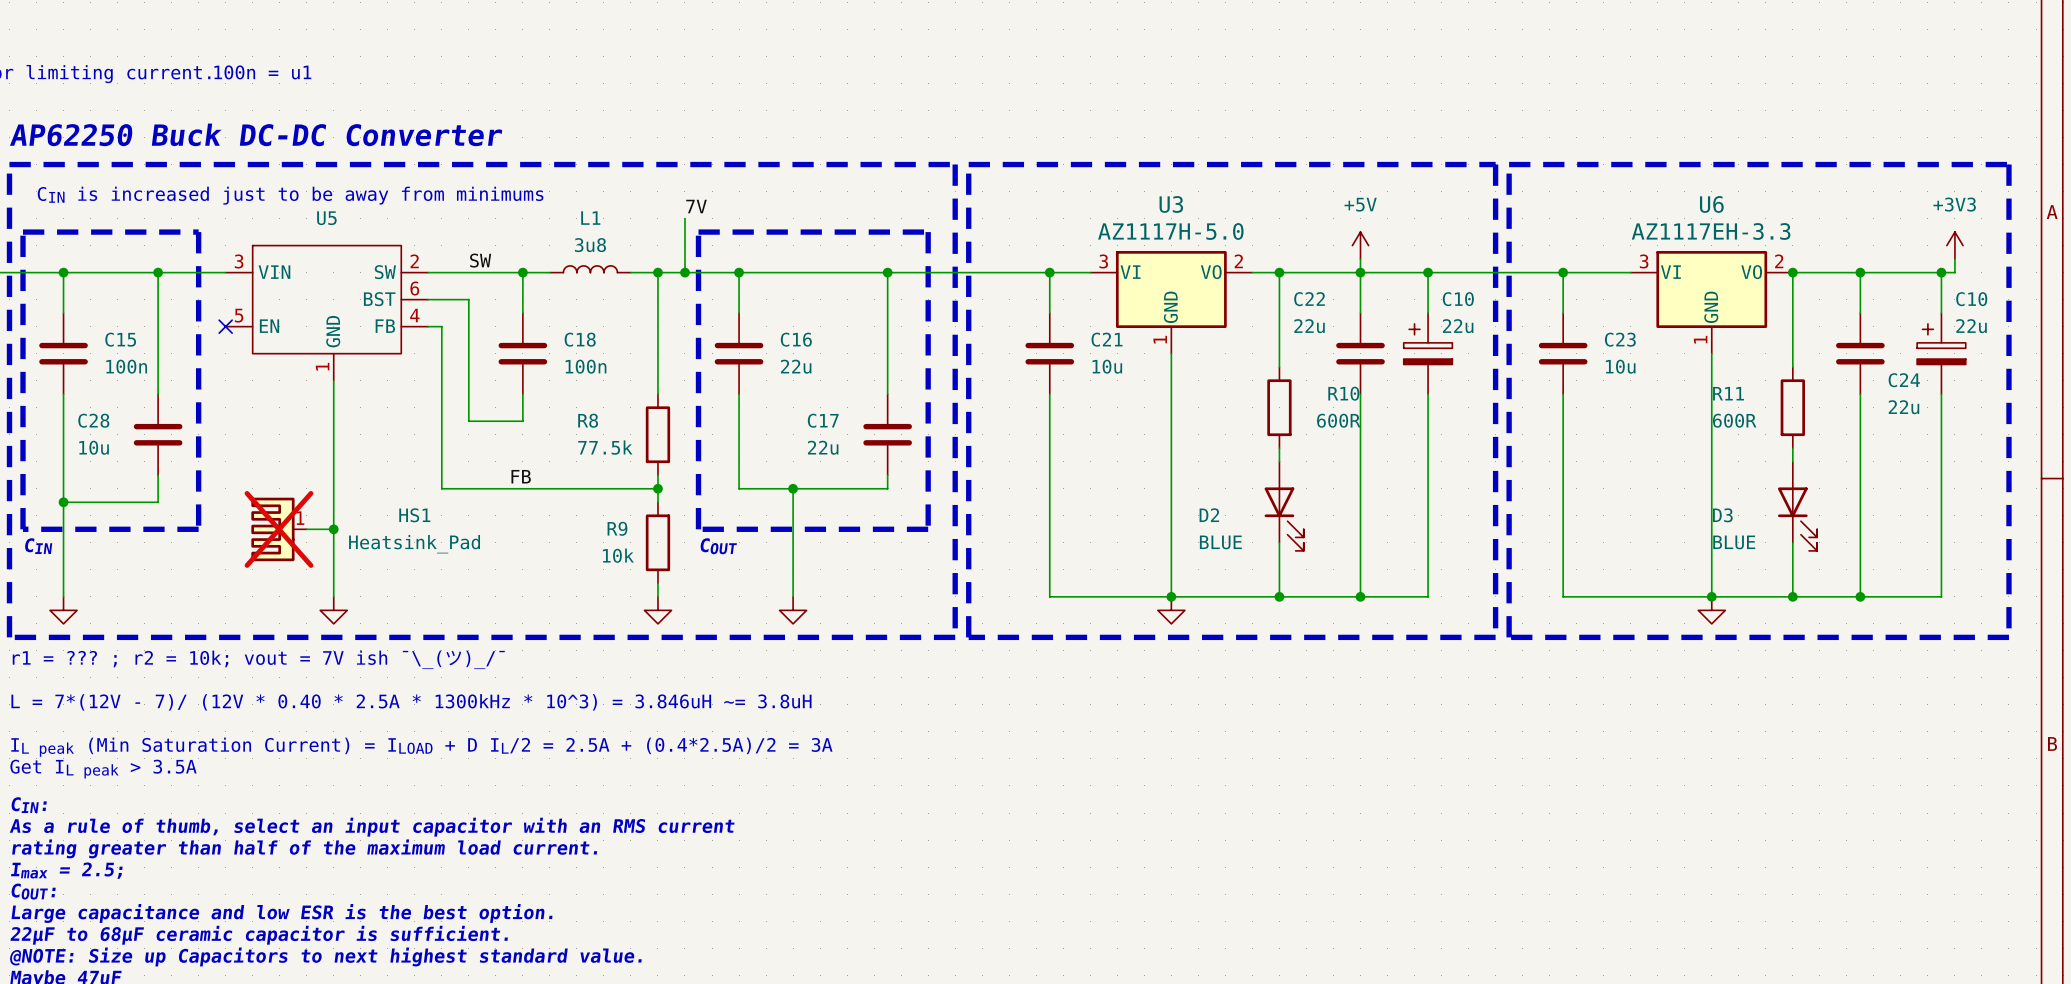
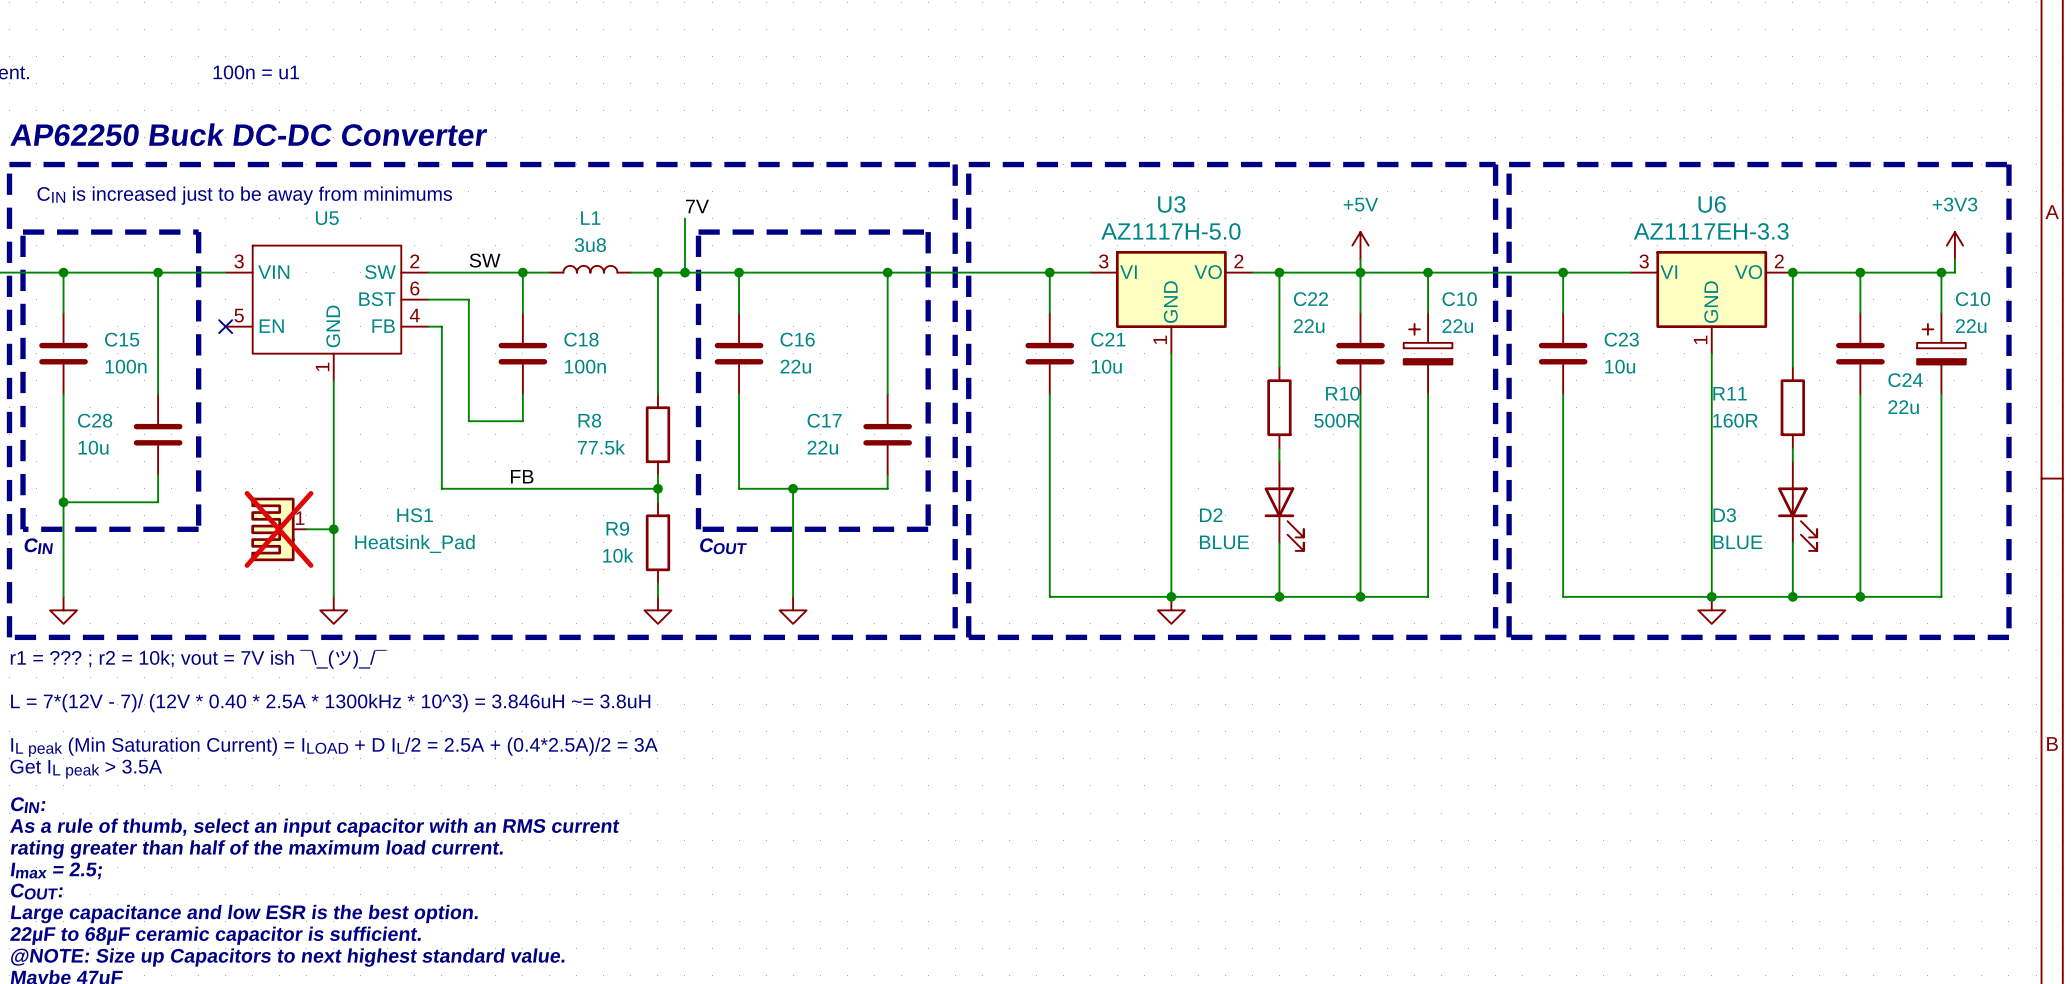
R10 value: 600R (1338, 420) -> 500R (1336, 420)
R11 value: 600R (1734, 420) -> 160R (1735, 420)

